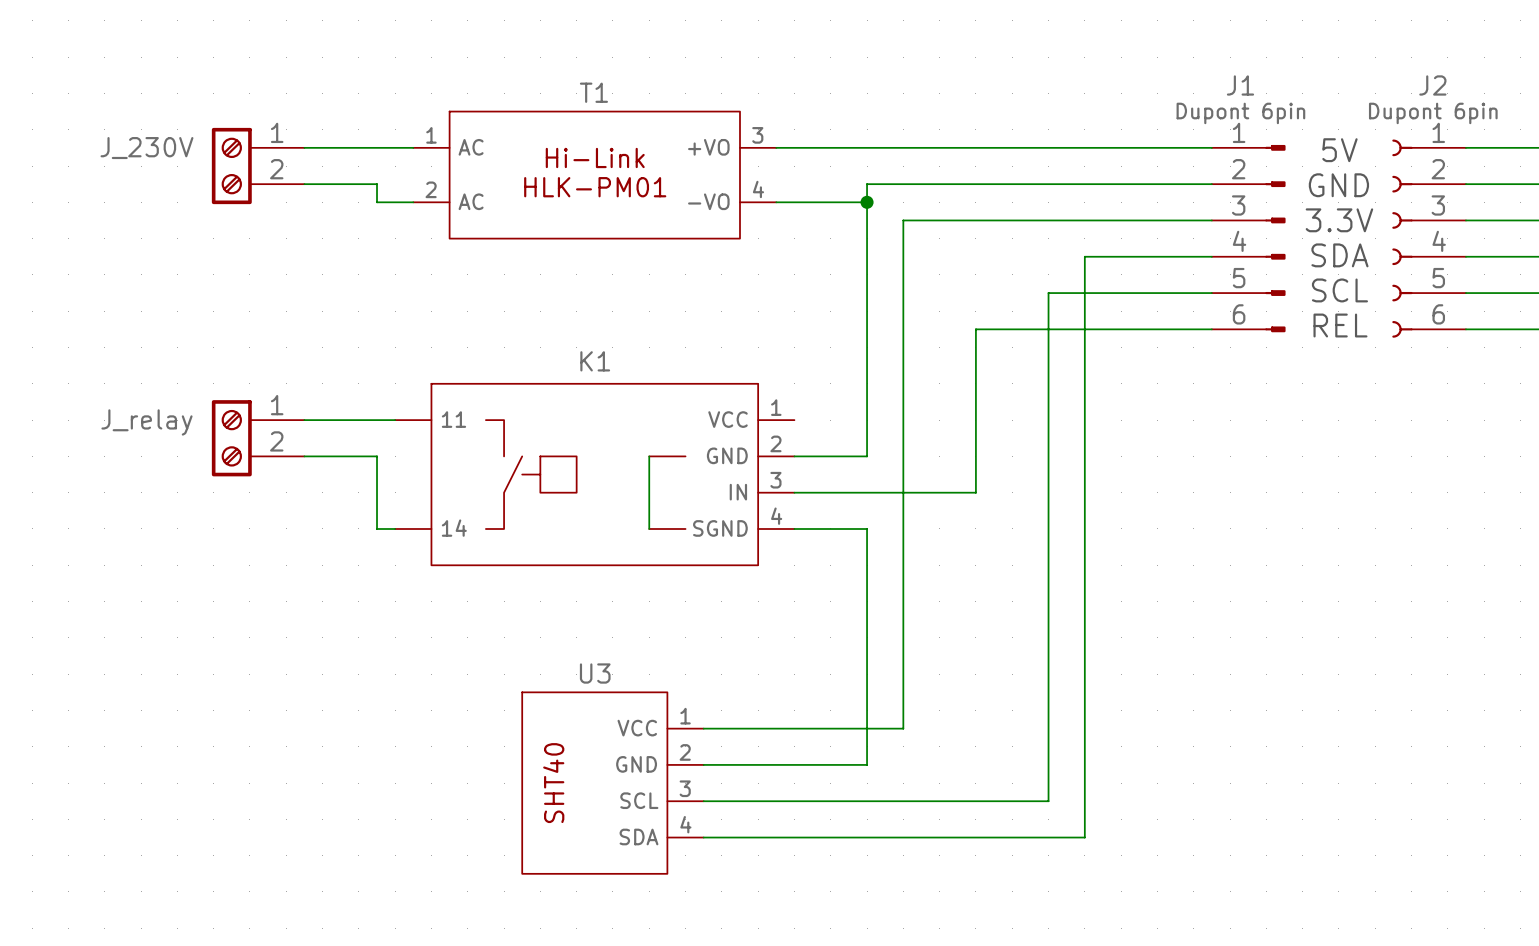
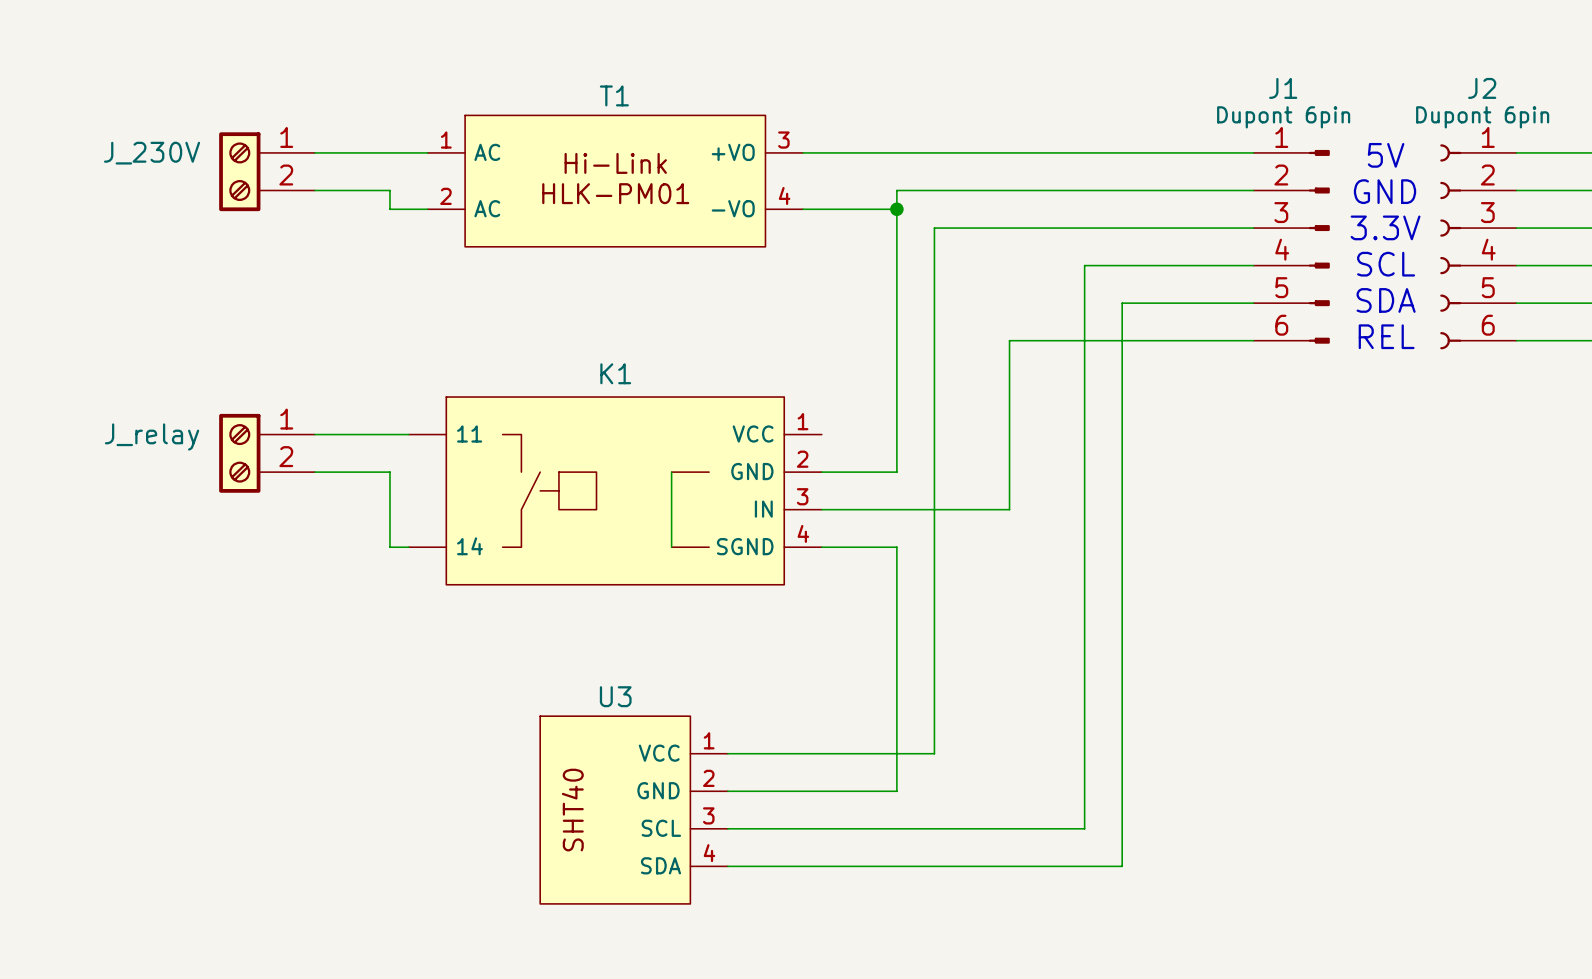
text: SDA (1339, 255) -> SCL (1386, 264)
wire: (1084, 256) (1084, 293) (1048, 293) -> (1122, 265) (1084, 265) (1084, 303)
text: SCL (1339, 290) -> SDA (1386, 300)

